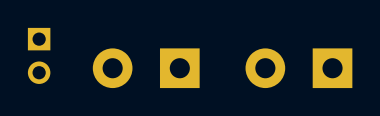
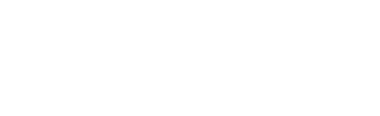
part: (39, 55) -> none
part: (146, 68) -> none
part: (298, 68) -> none

